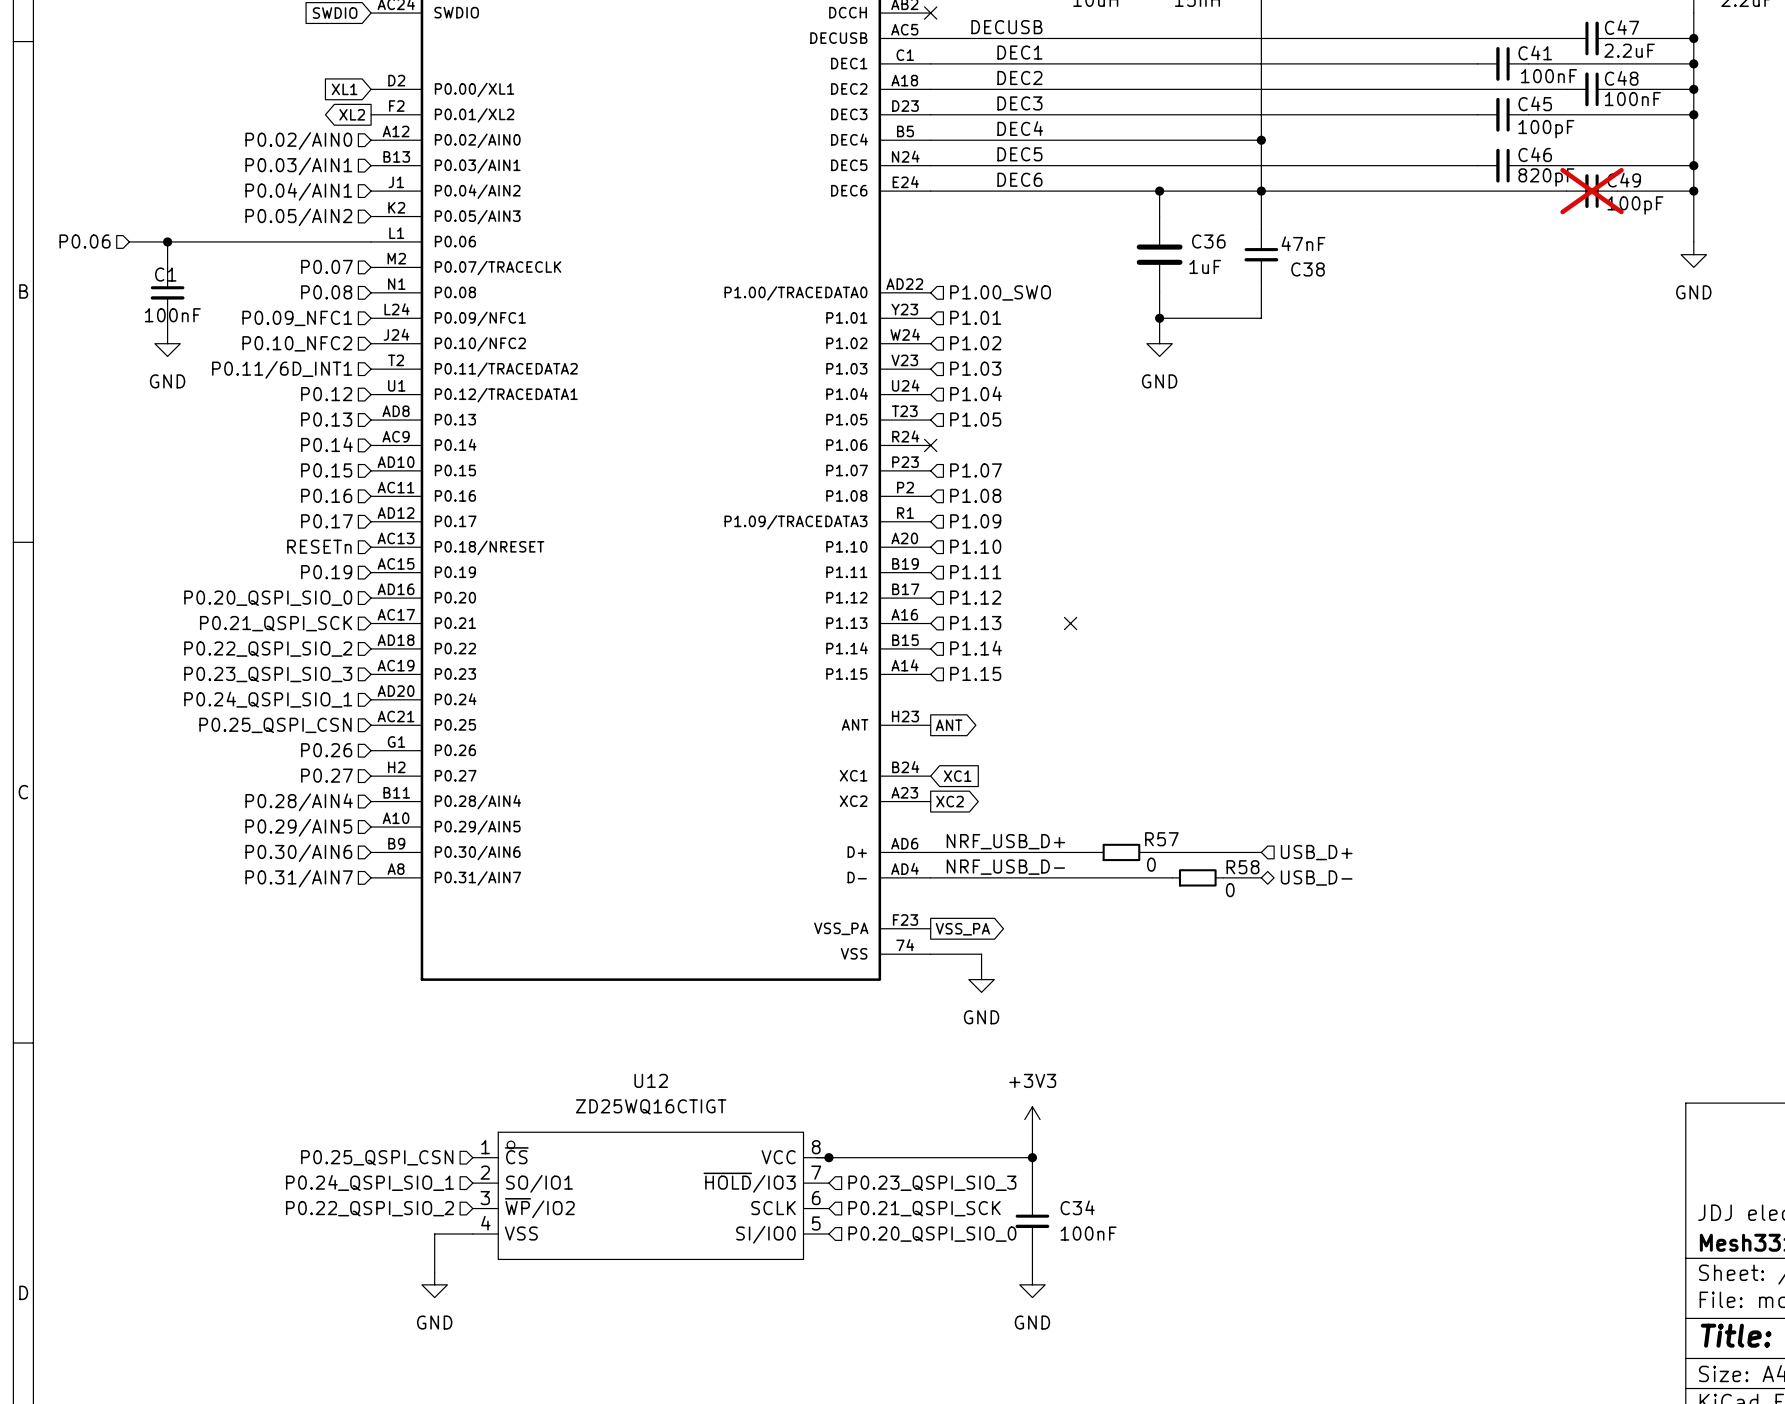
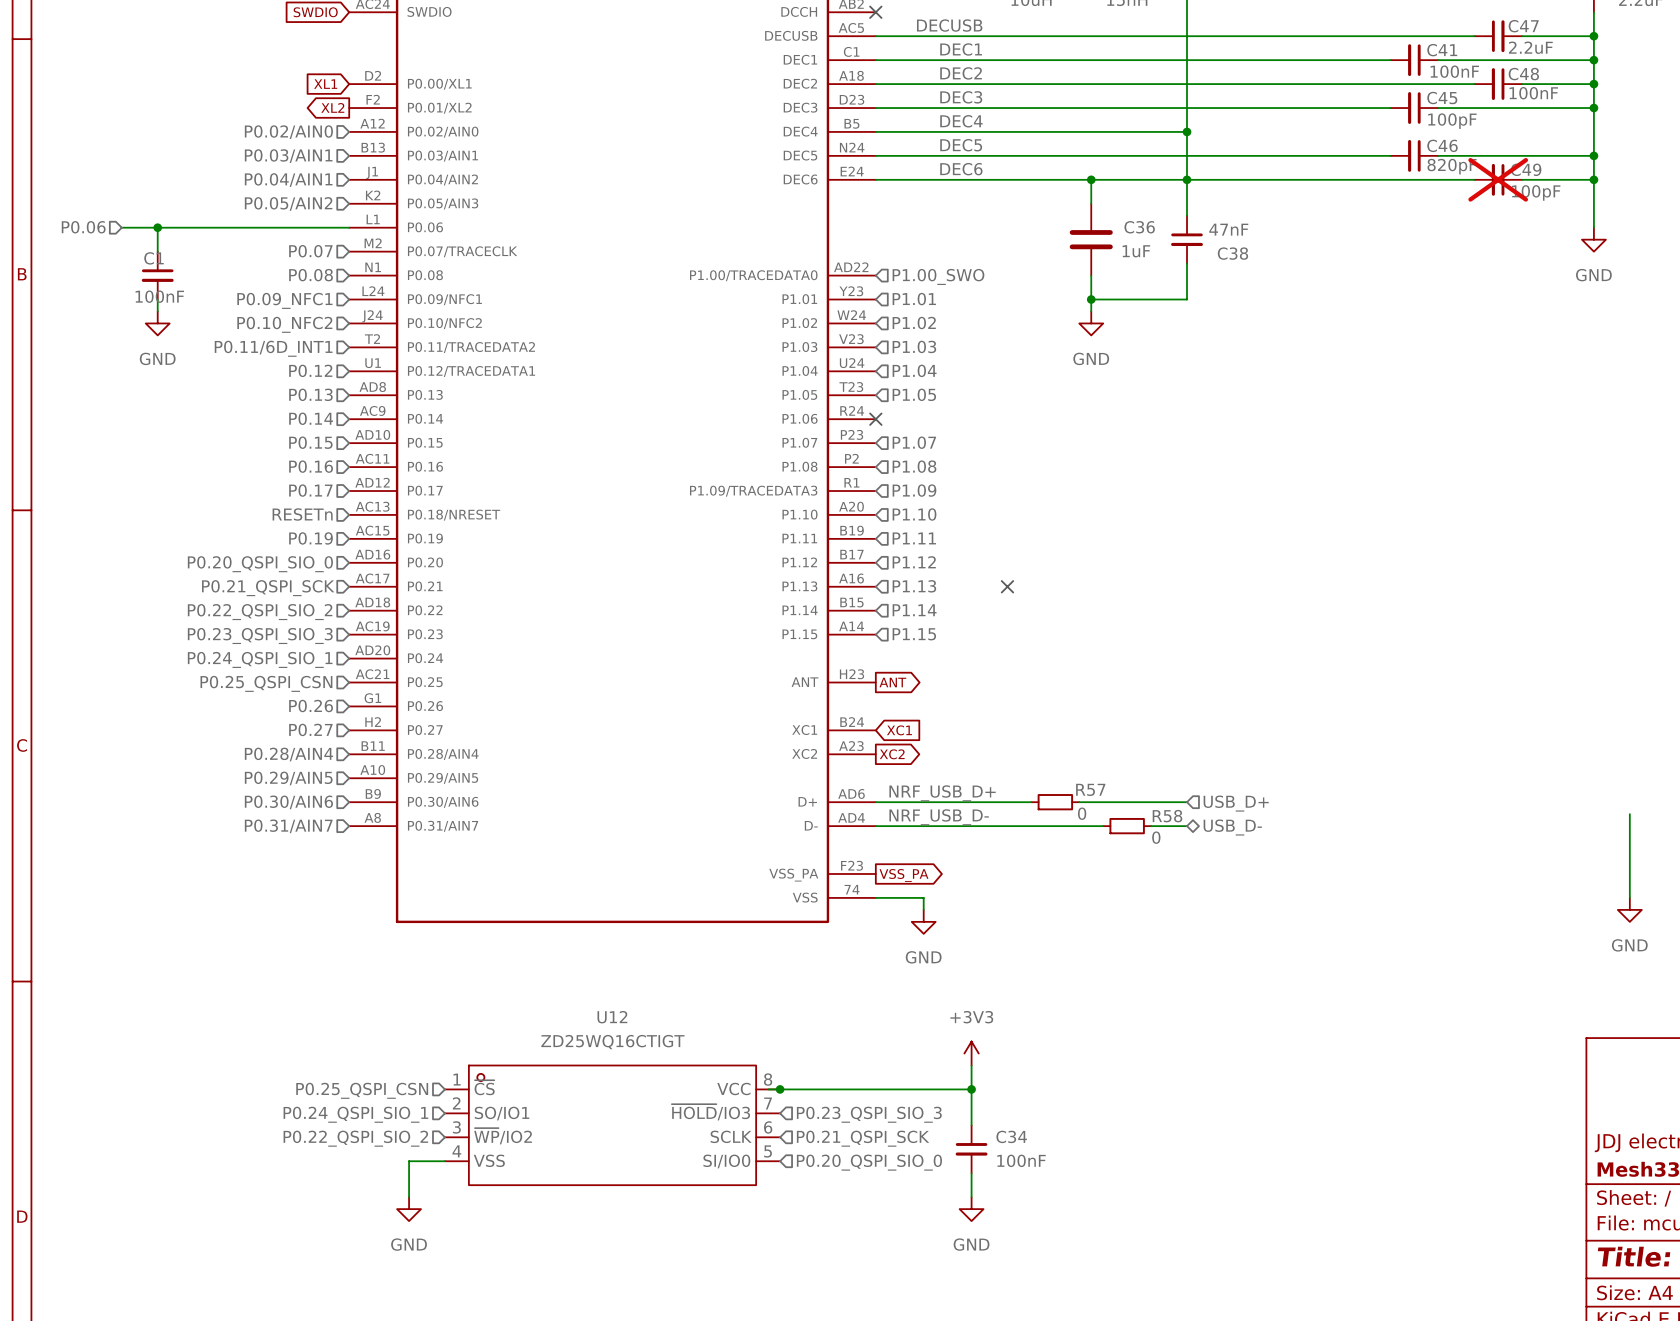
wire: none -> (1629, 814) (1629, 897)
power symbol: none -> GND (1629, 909)

